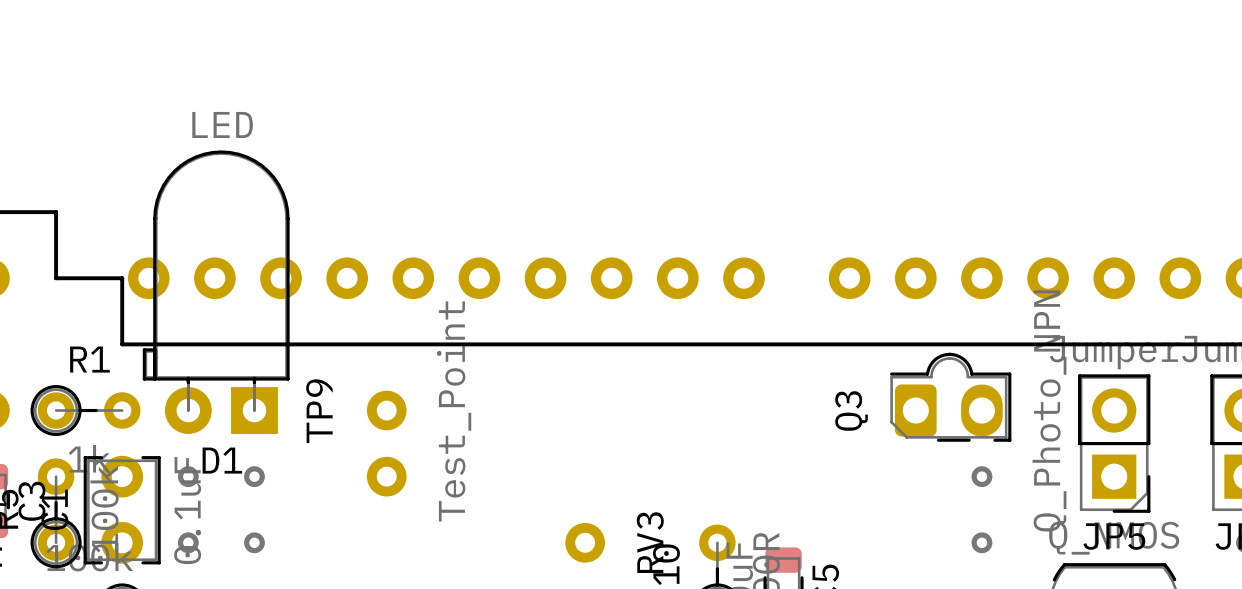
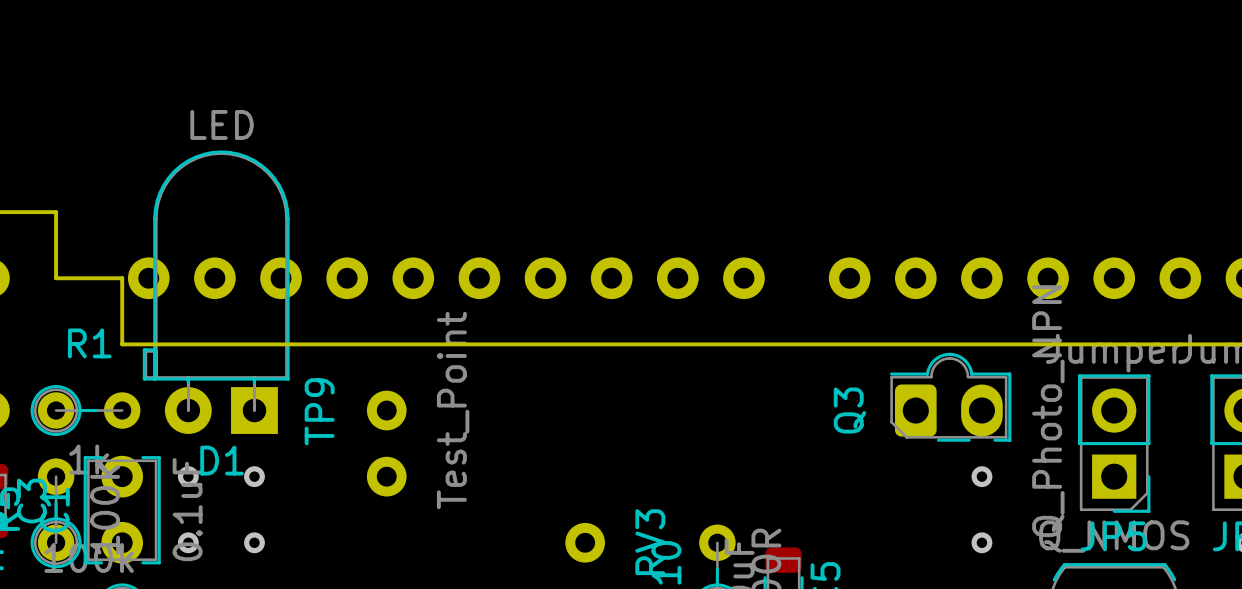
R1 name position: R1 (89, 359) -> R1 (89, 343)

